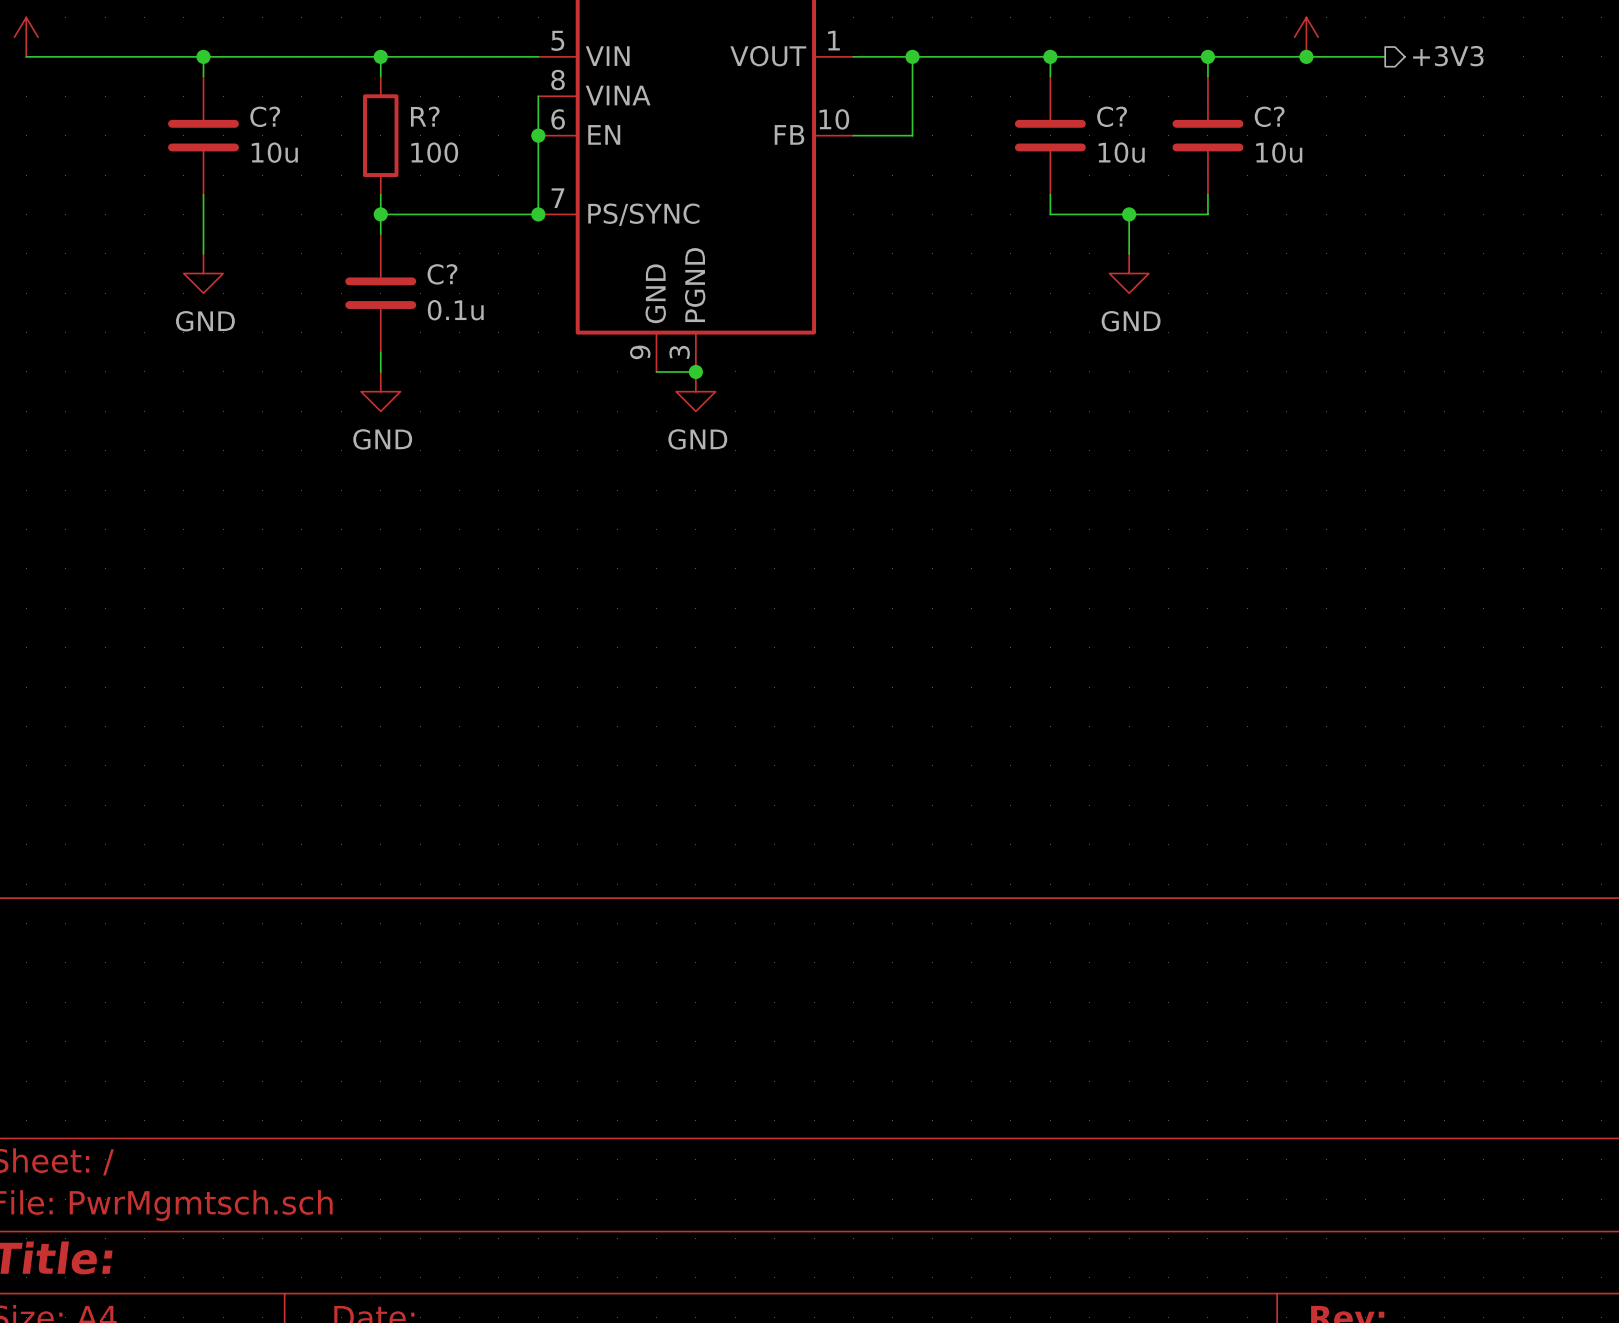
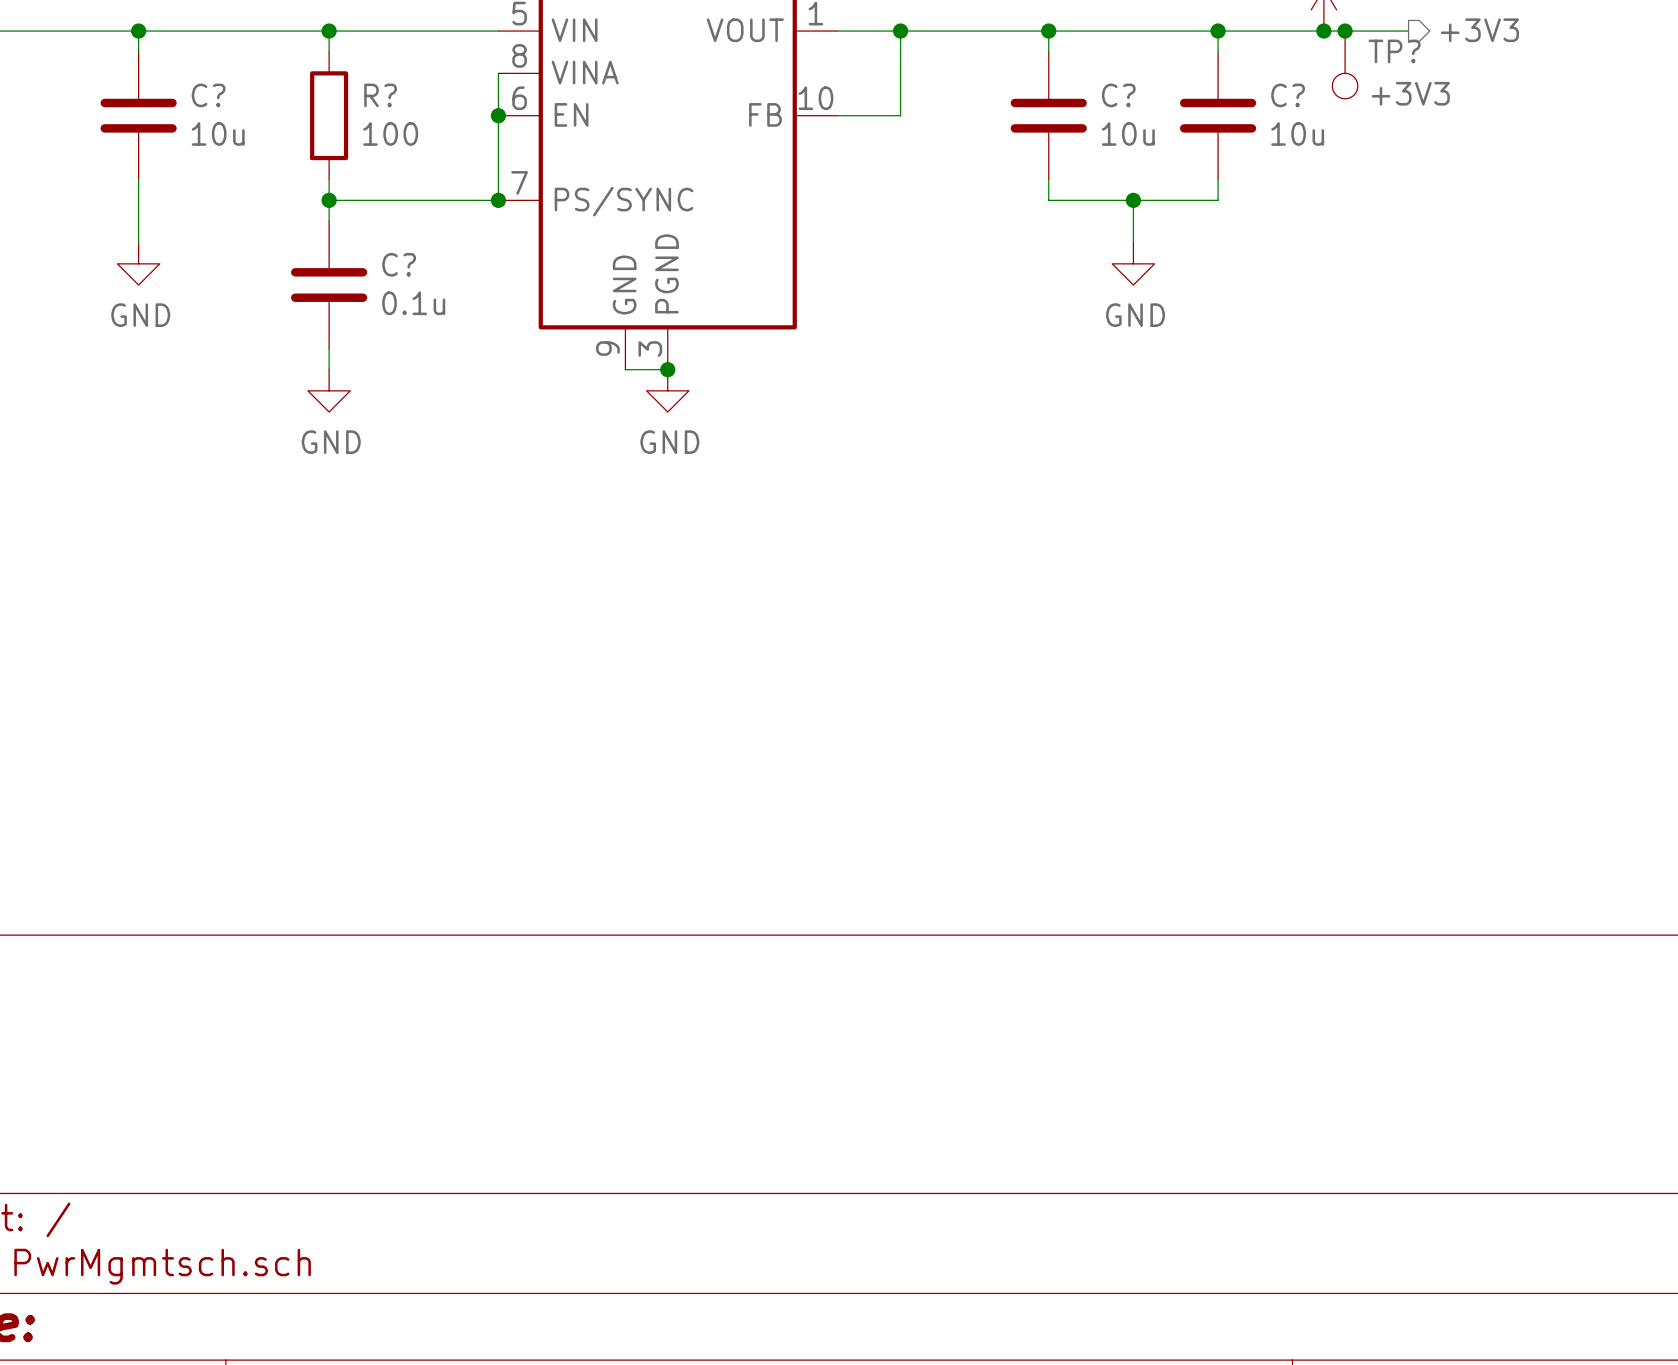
junction: none -> (1345, 31)
TP?: none -> +3V3 (1345, 64)

